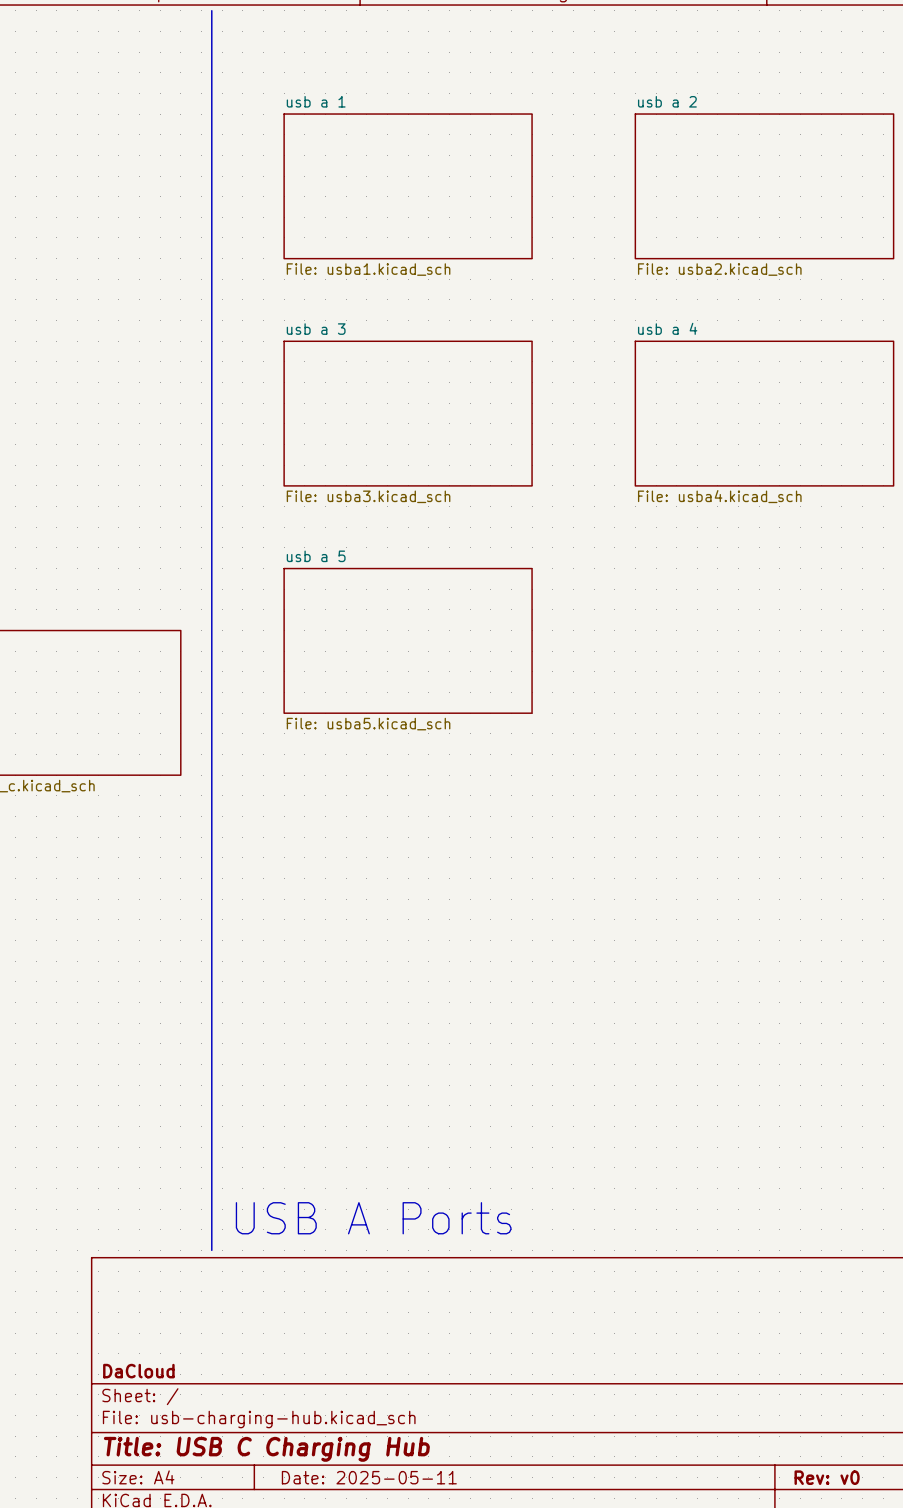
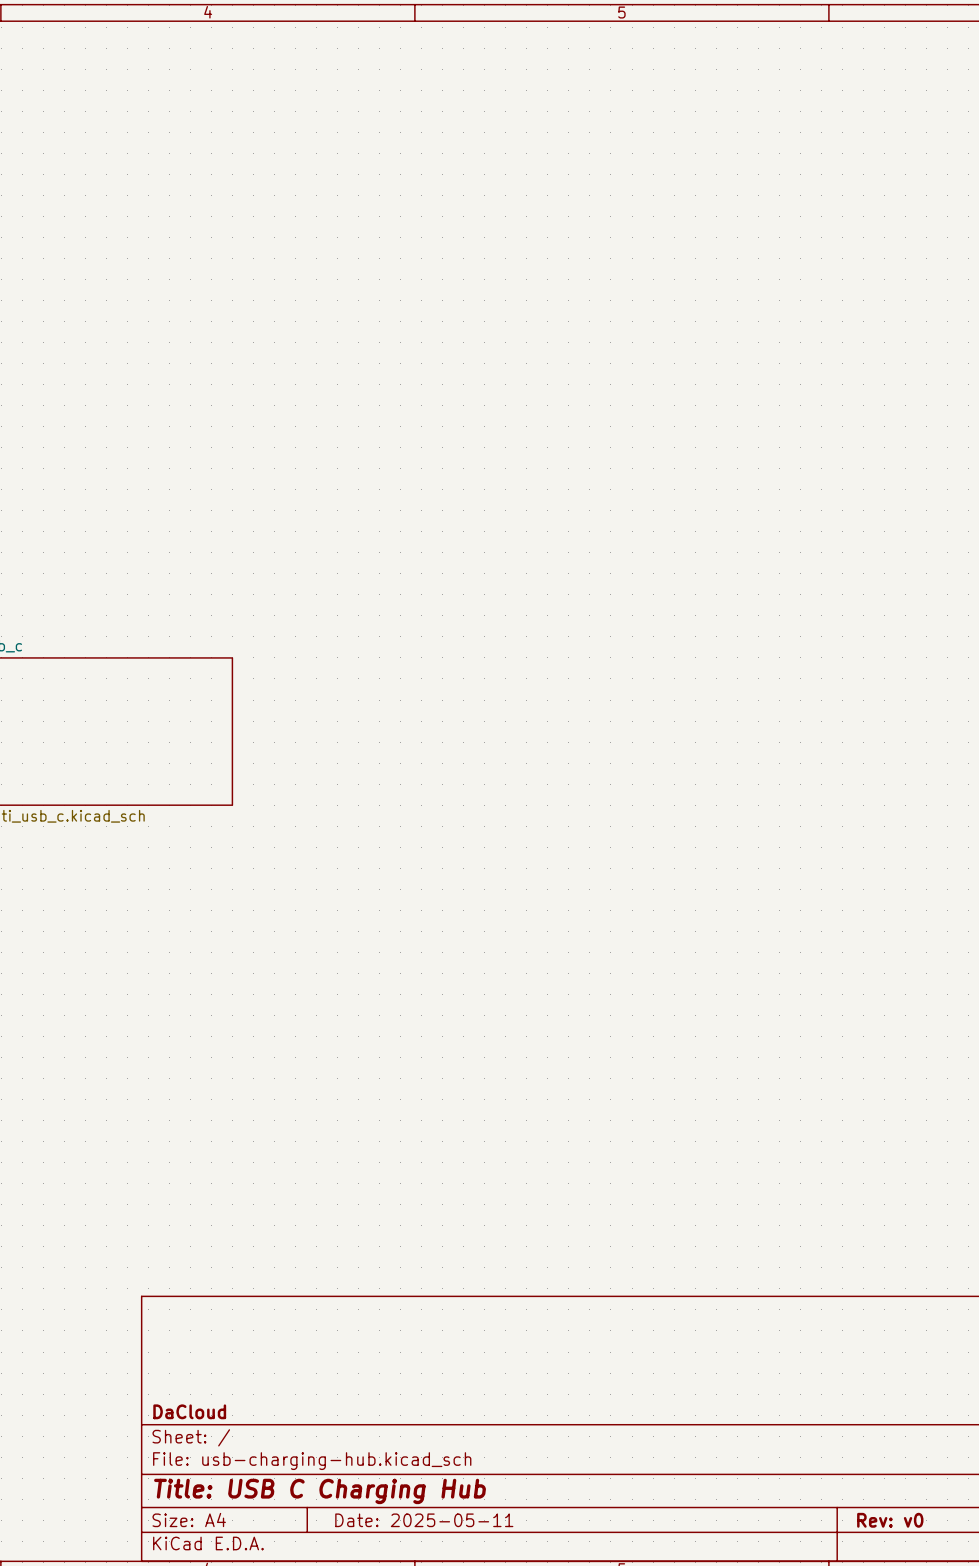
line: (211, 10) (211, 1250) -> none
sheet usb a 1: File: usba1.kicad_sch (408, 186) -> none
sheet usb a 2: File: usba2.kicad_sch (764, 186) -> none
sheet usb a 3: File: usba3.kicad_sch (408, 413) -> none
sheet usb a 4: File: usba4.kicad_sch (764, 413) -> none
sheet usb a 5: File: usba5.kicad_sch (408, 640) -> none
text: USB A Ports (373, 1218) -> none

